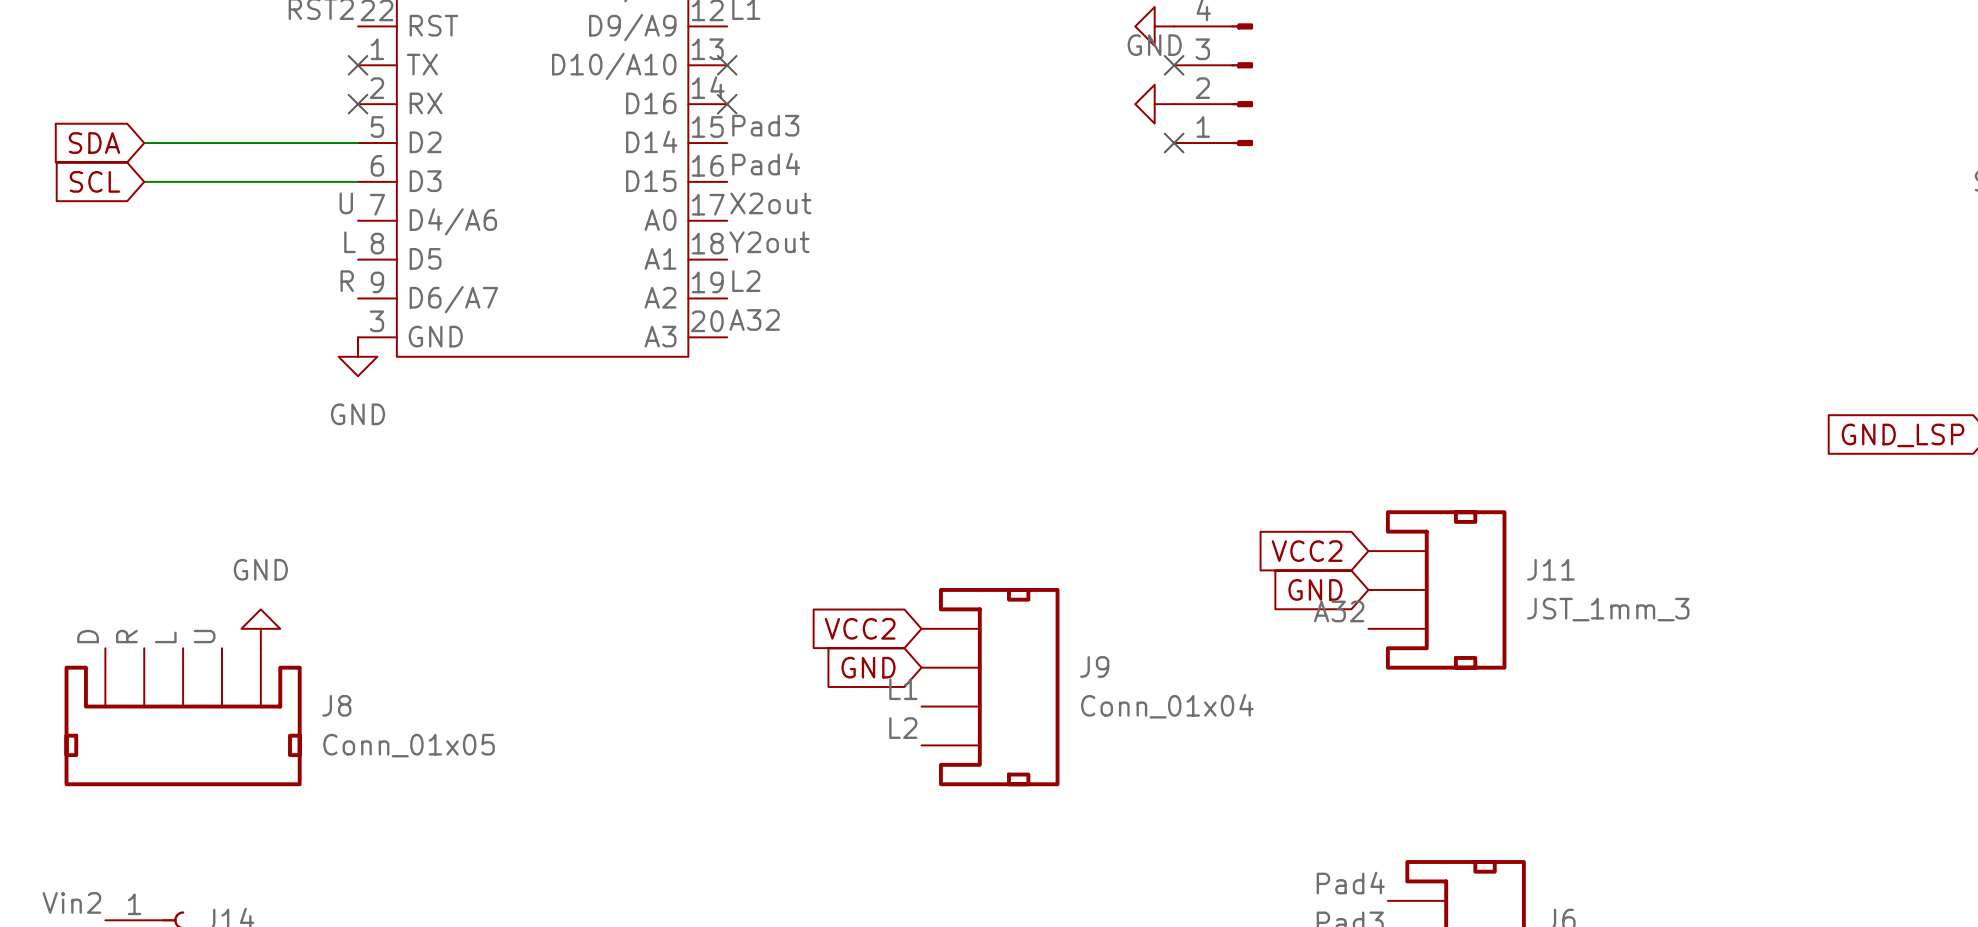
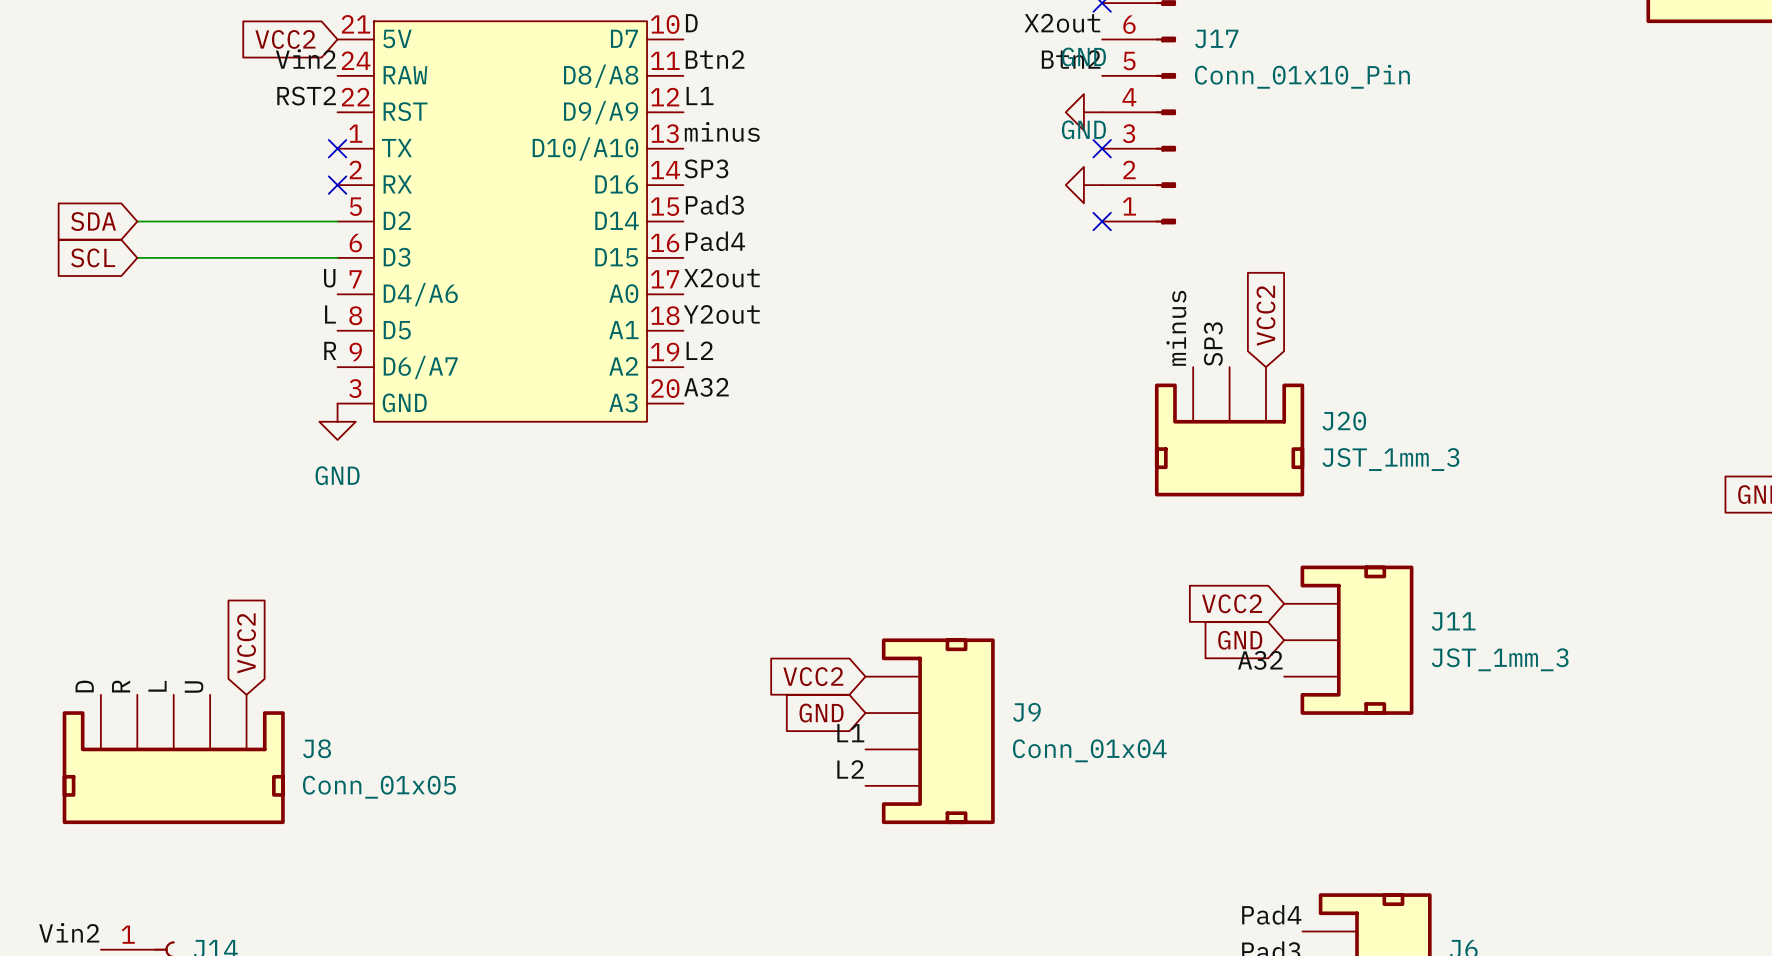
label: none -> minus (722, 131)
no-connect mark: (727, 65) -> none
label: none -> SP3 (706, 168)
no-connect mark: (727, 104) -> none
global label: none -> VCC2 (1265, 315)
label: none -> minus (1176, 328)
label: none -> SP3 (1213, 344)
J20: none -> JST_1mm_3 (1229, 431)
global label: none -> VCC2 (246, 643)
power symbol: GND (260, 628) -> none

